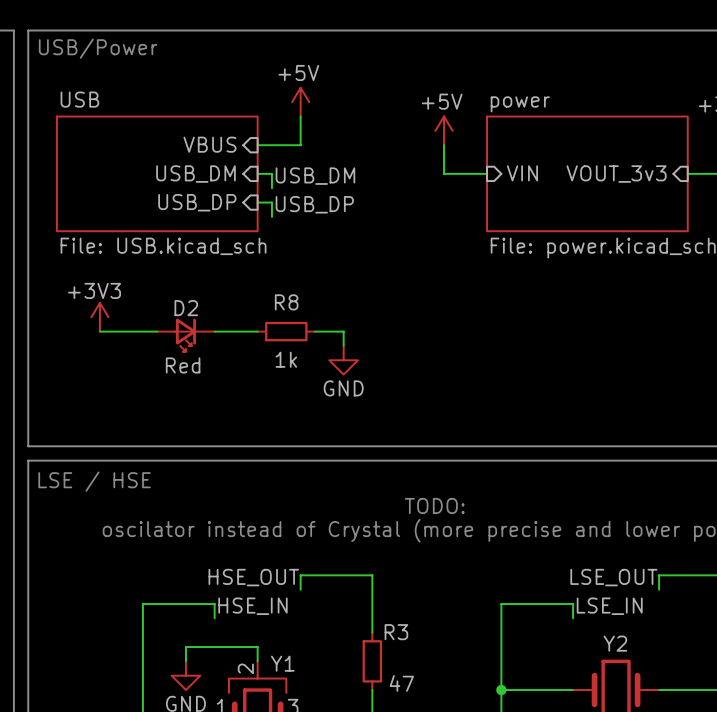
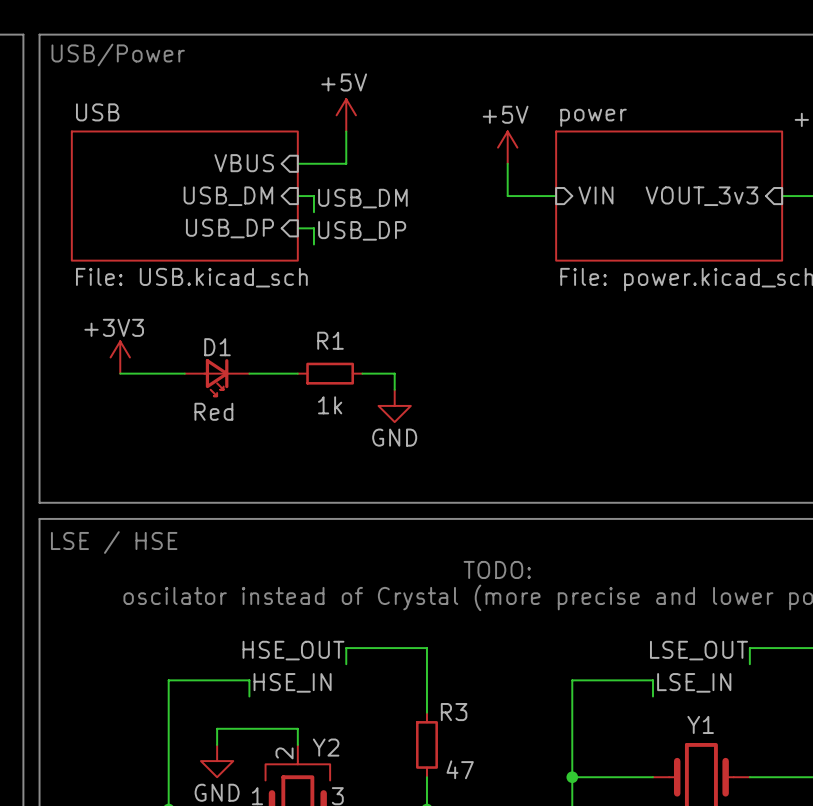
R8 name: R8 (286, 302) -> R1 (330, 340)
D2 name: D2 (186, 308) -> D1 (217, 347)
Y2 name: Y2 (615, 643) -> Y1 (700, 724)
Y1 name: Y1 (282, 663) -> Y2 (326, 747)

